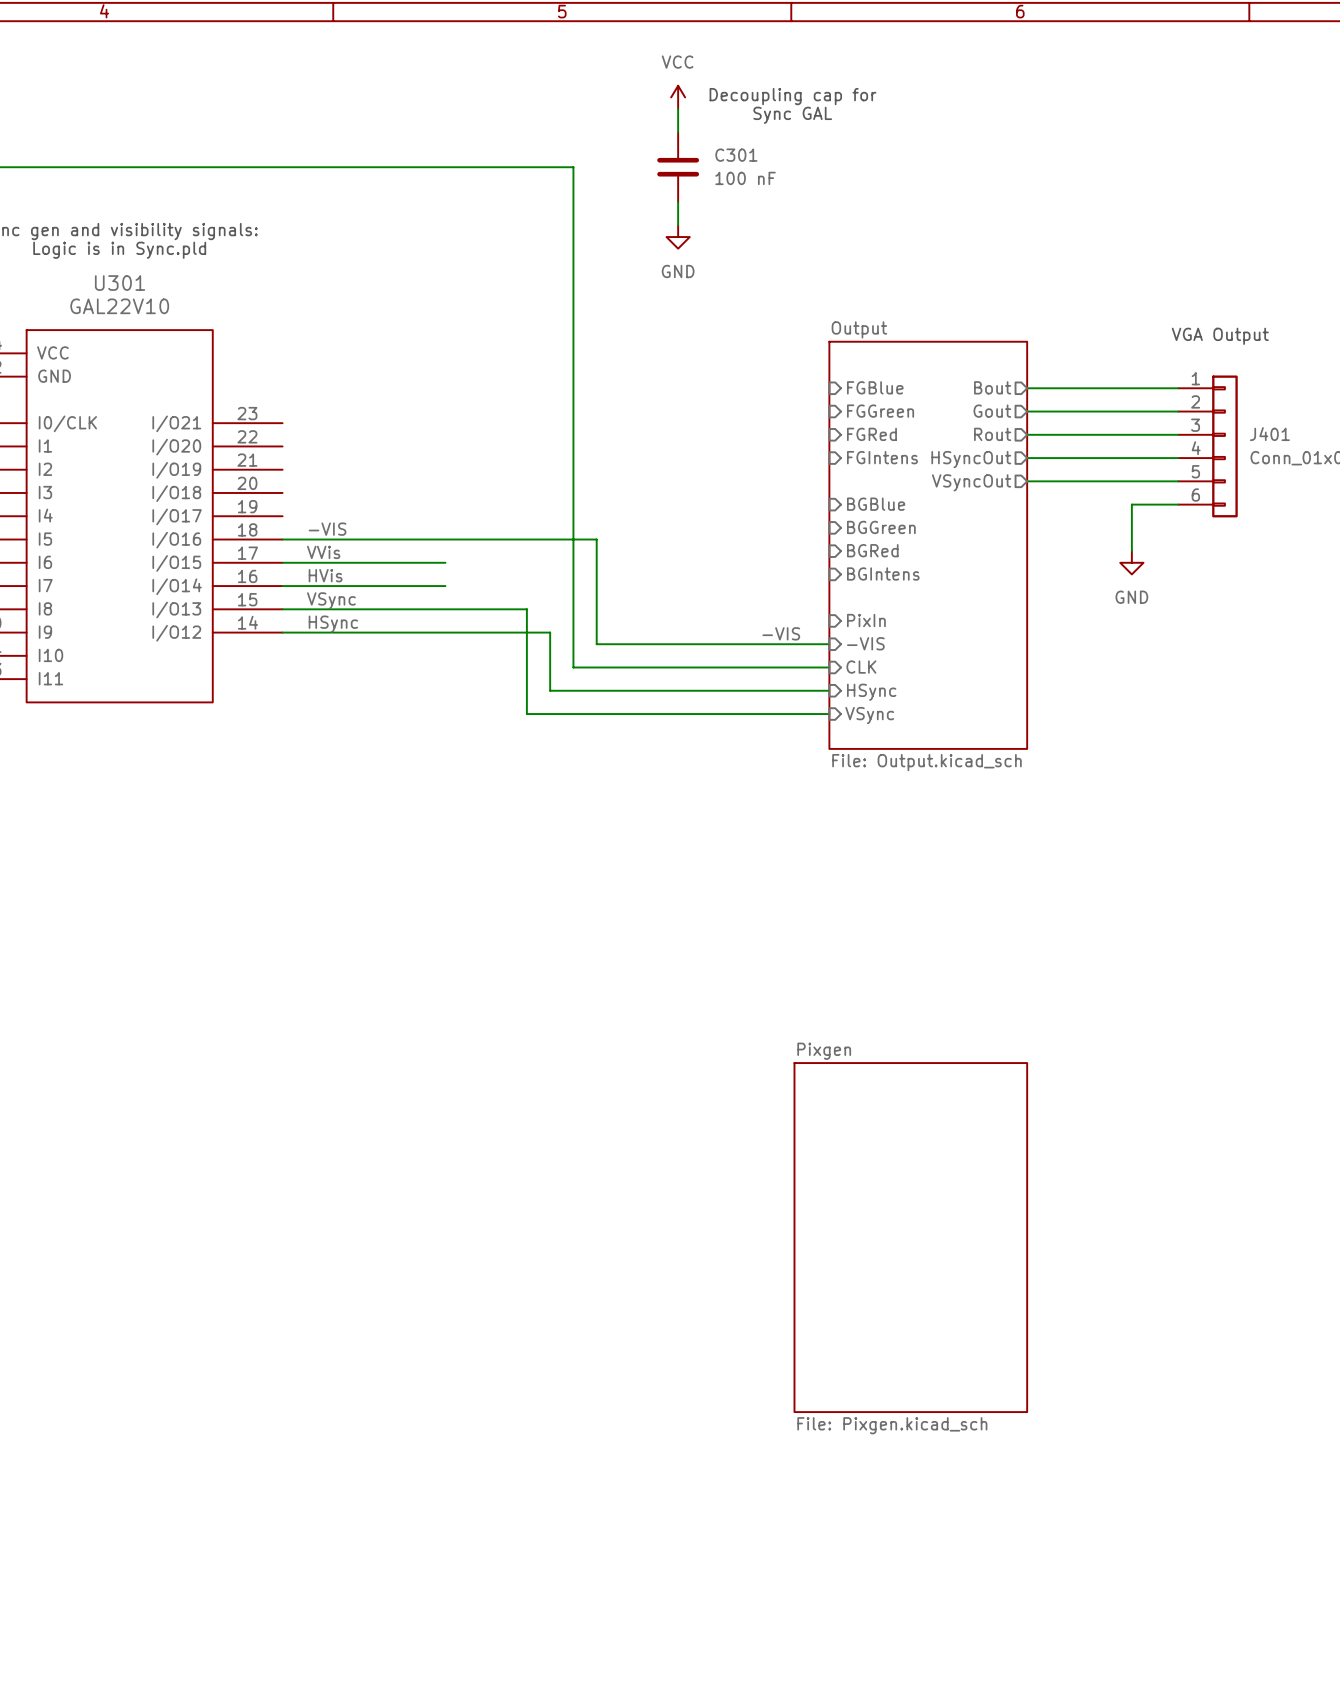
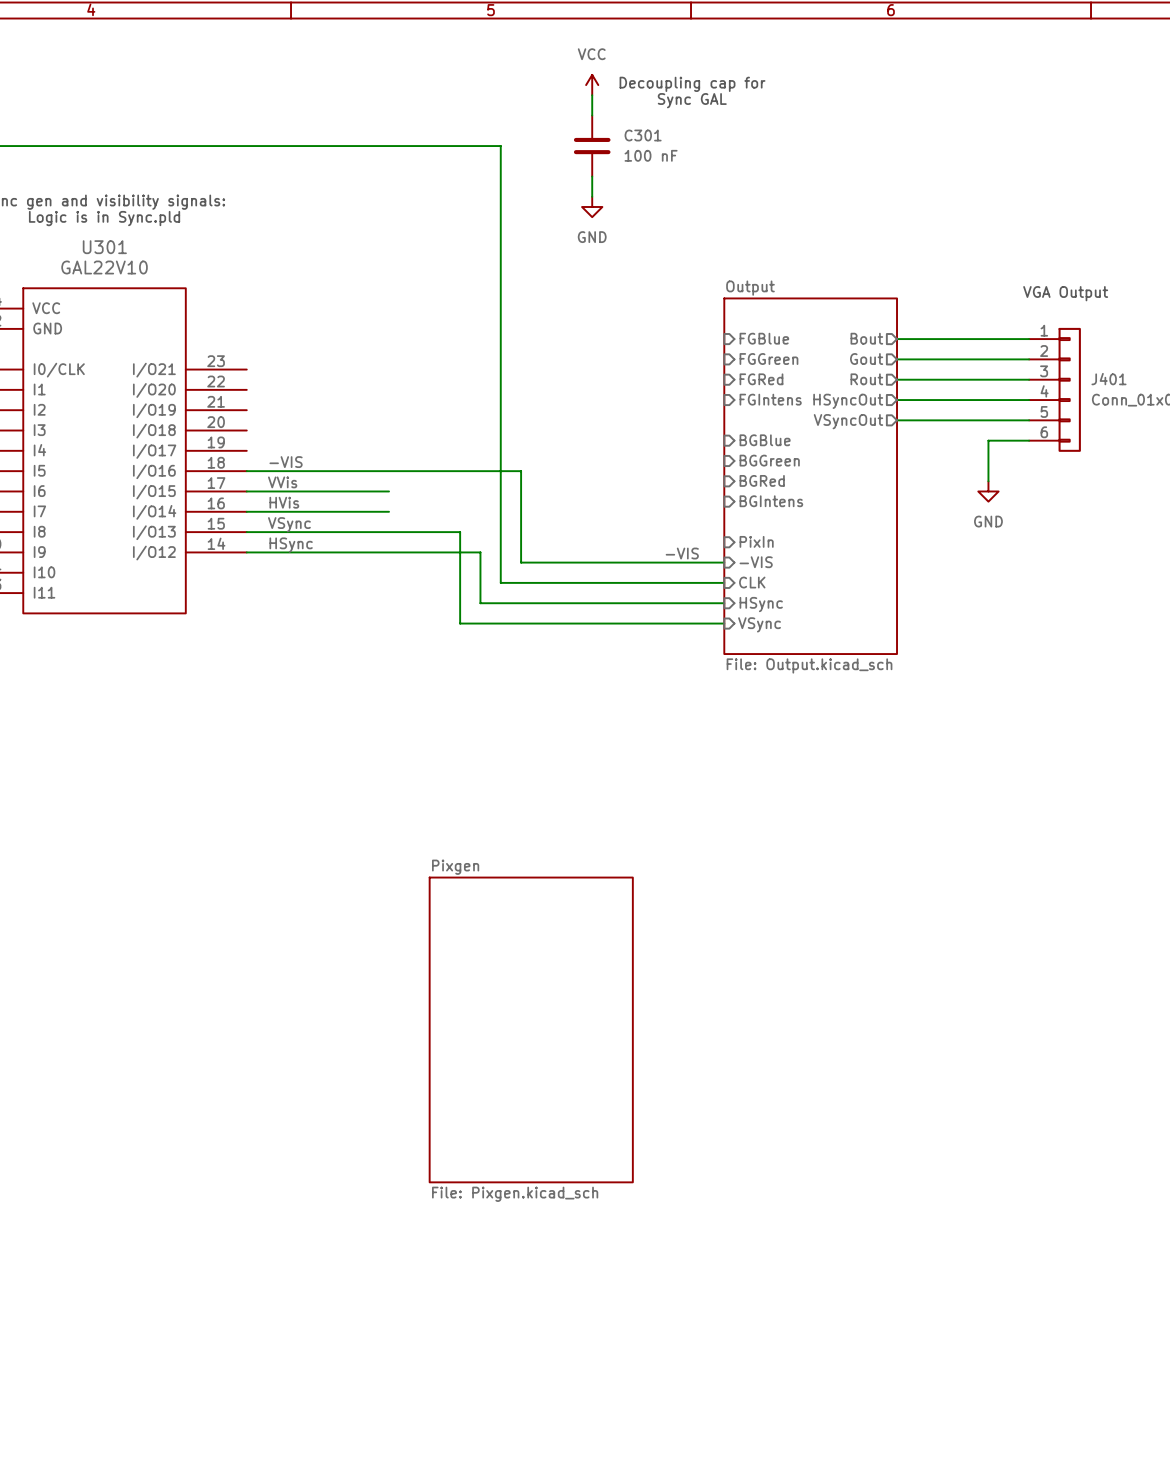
sheet Pixgen: none -> File: Pixgen.kicad_sch (531, 1029)
sheet Pixgen: File: Pixgen.kicad_sch (910, 1237) -> none

